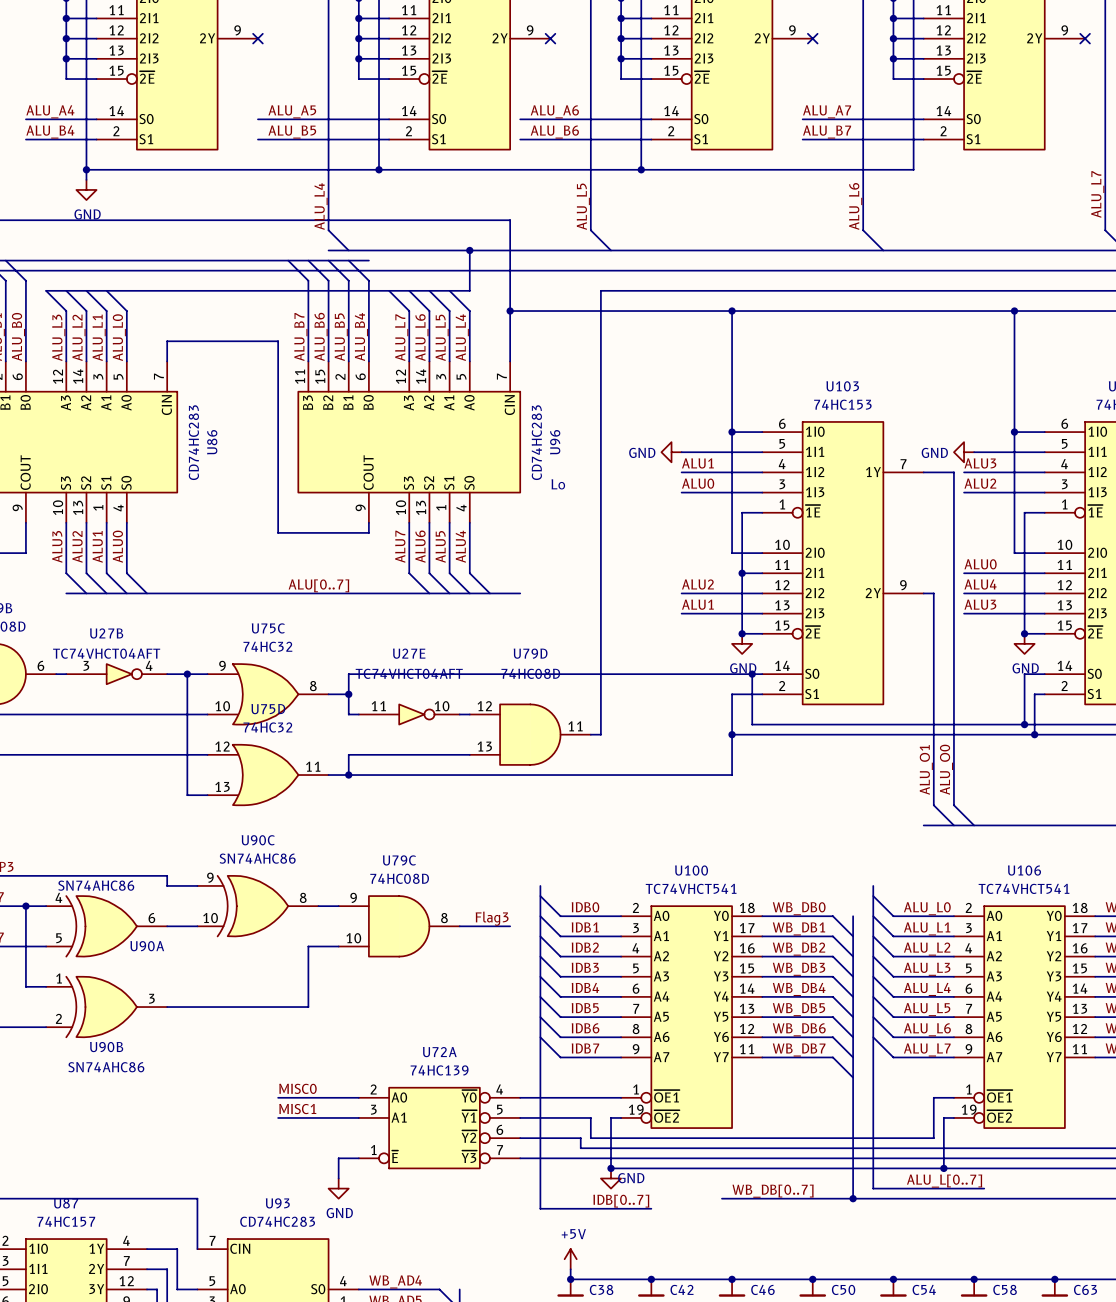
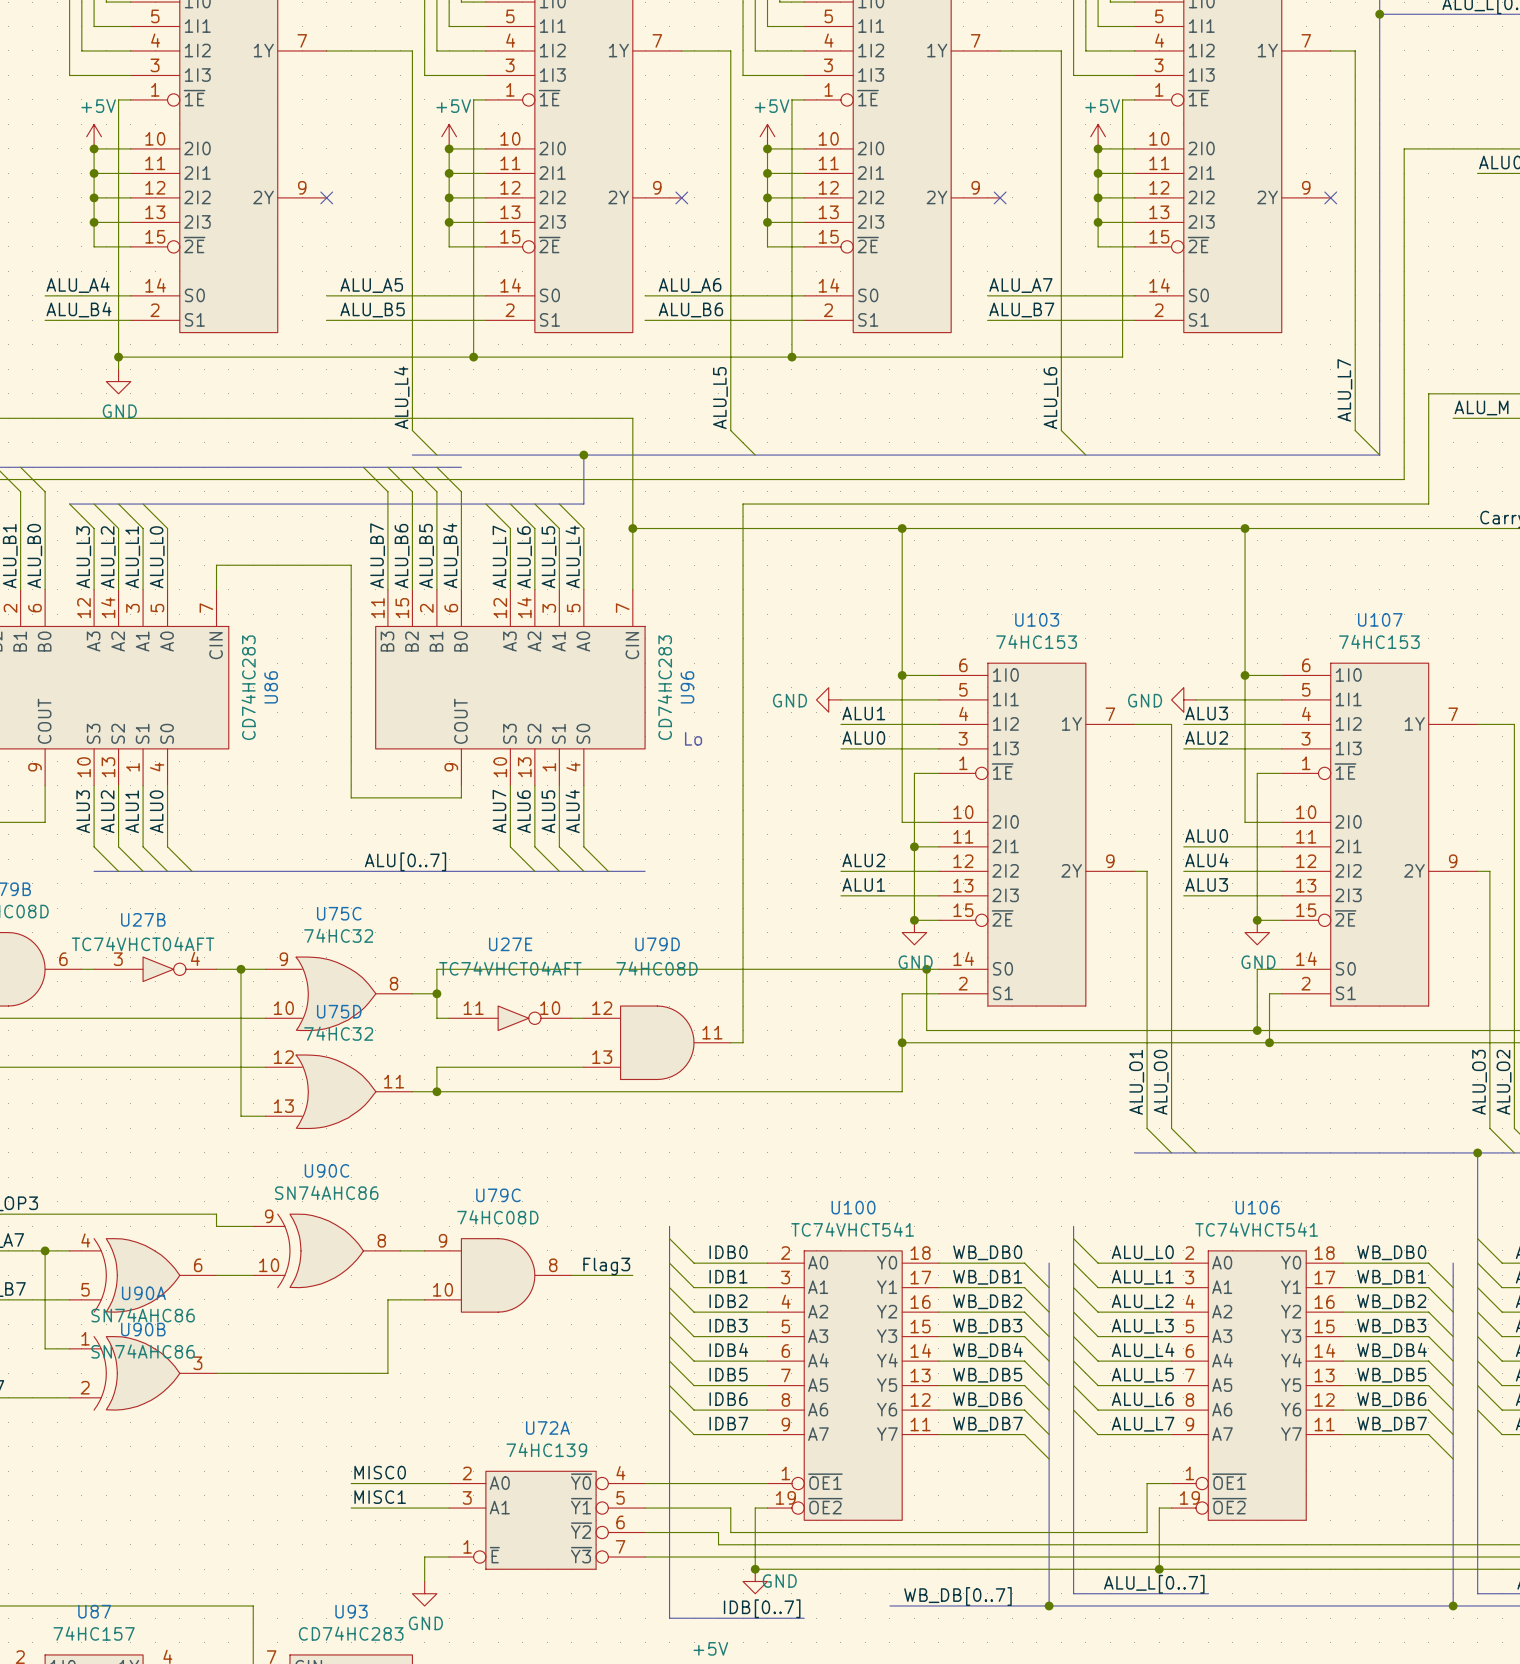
U90A value position: SN74AHC86 (96, 885) -> SN74AHC86 (143, 1315)
U90A name position: U90A (147, 946) -> U90A (143, 1293)
U90B name position: U90B (106, 1047) -> U90B (143, 1329)
U90B value position: SN74AHC86 (106, 1067) -> SN74AHC86 (143, 1351)

